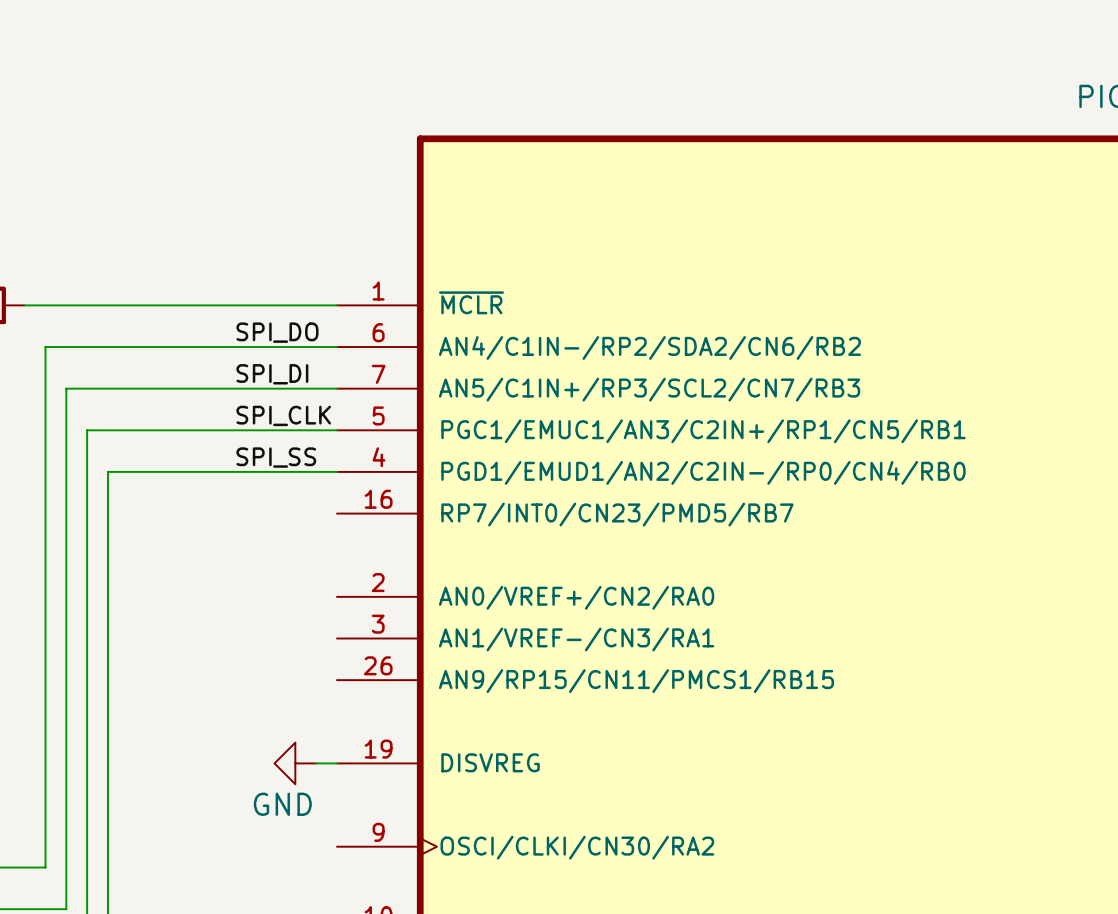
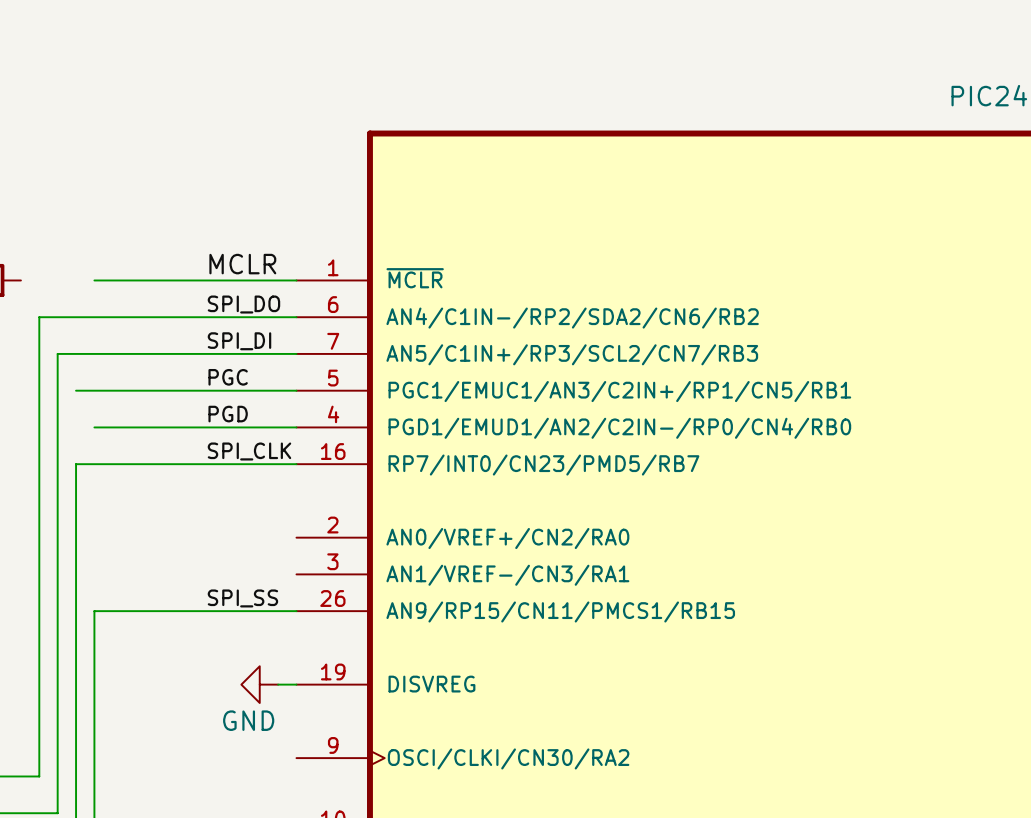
label: none -> MCLR (242, 264)
wire: (24, 305) (107, 305) -> none
label: SPI_CLK (283, 415) -> PGC (228, 377)
wire: (87, 430) (87, 513) -> (296, 464) (76, 464)
label: SPI_SS (276, 457) -> PGD (228, 414)
wire: (107, 471) (107, 680) -> (296, 611) (94, 611)
label: none -> SPI_CLK (249, 451)
label: none -> SPI_SS (242, 598)

